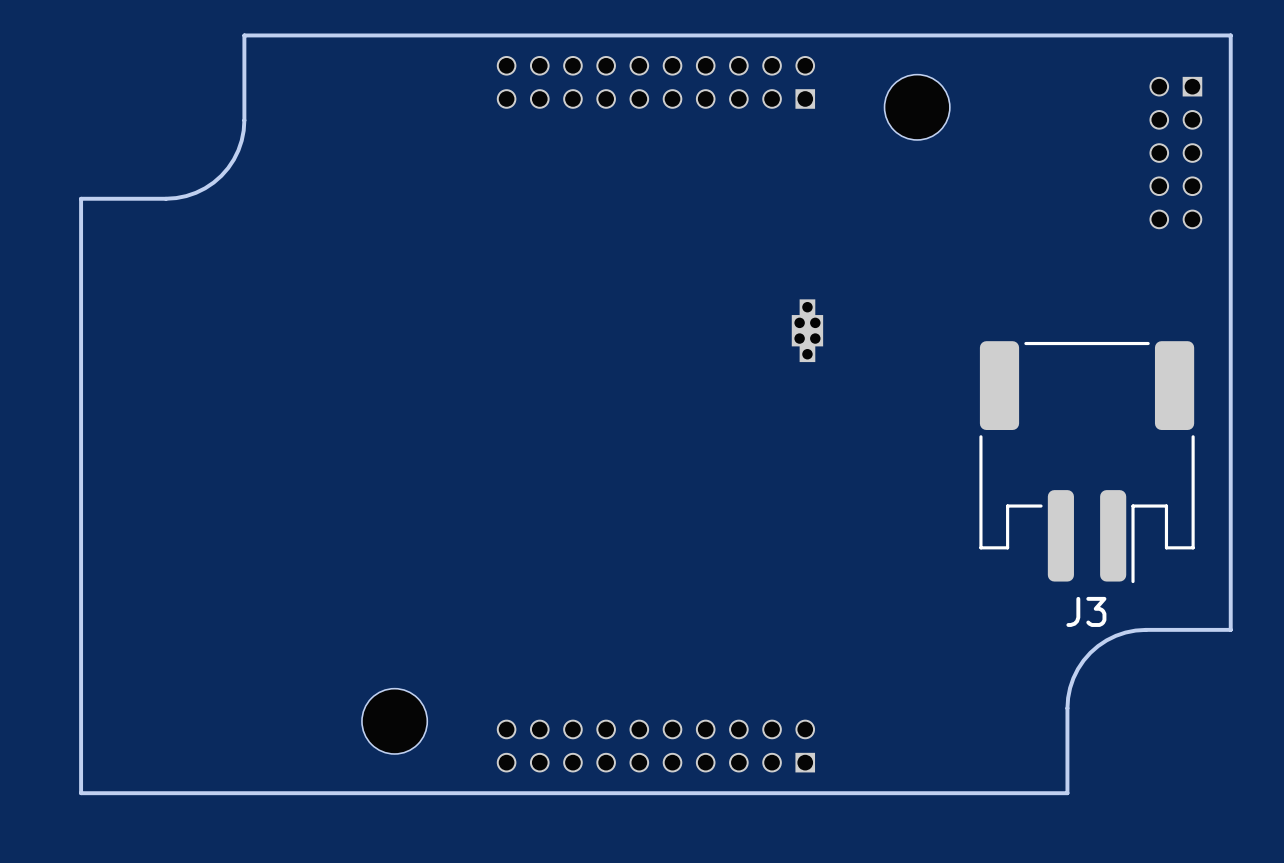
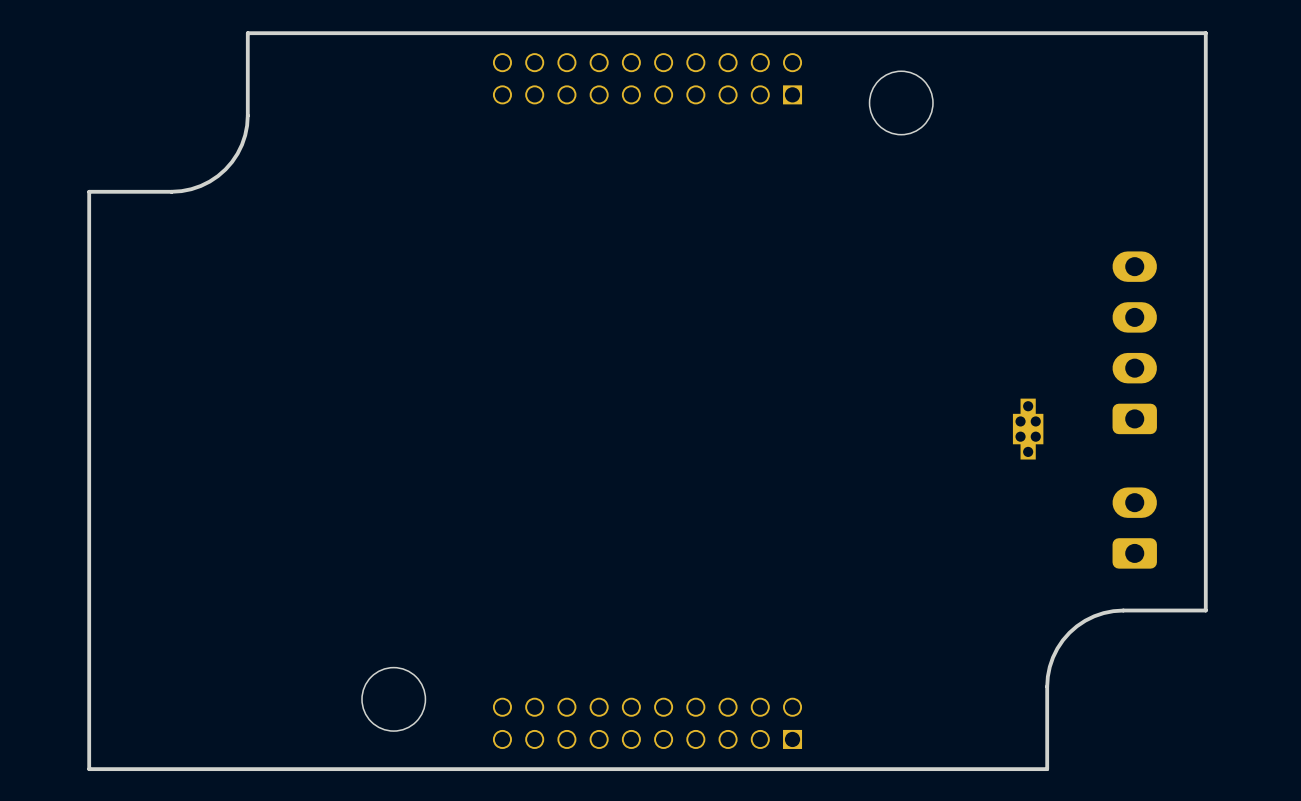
part: (1175, 153) -> none
part position: (807, 330) -> (1028, 429)
part: none -> (1134, 342)
J3: (1087, 462) -> none
part: none -> (1134, 528)

